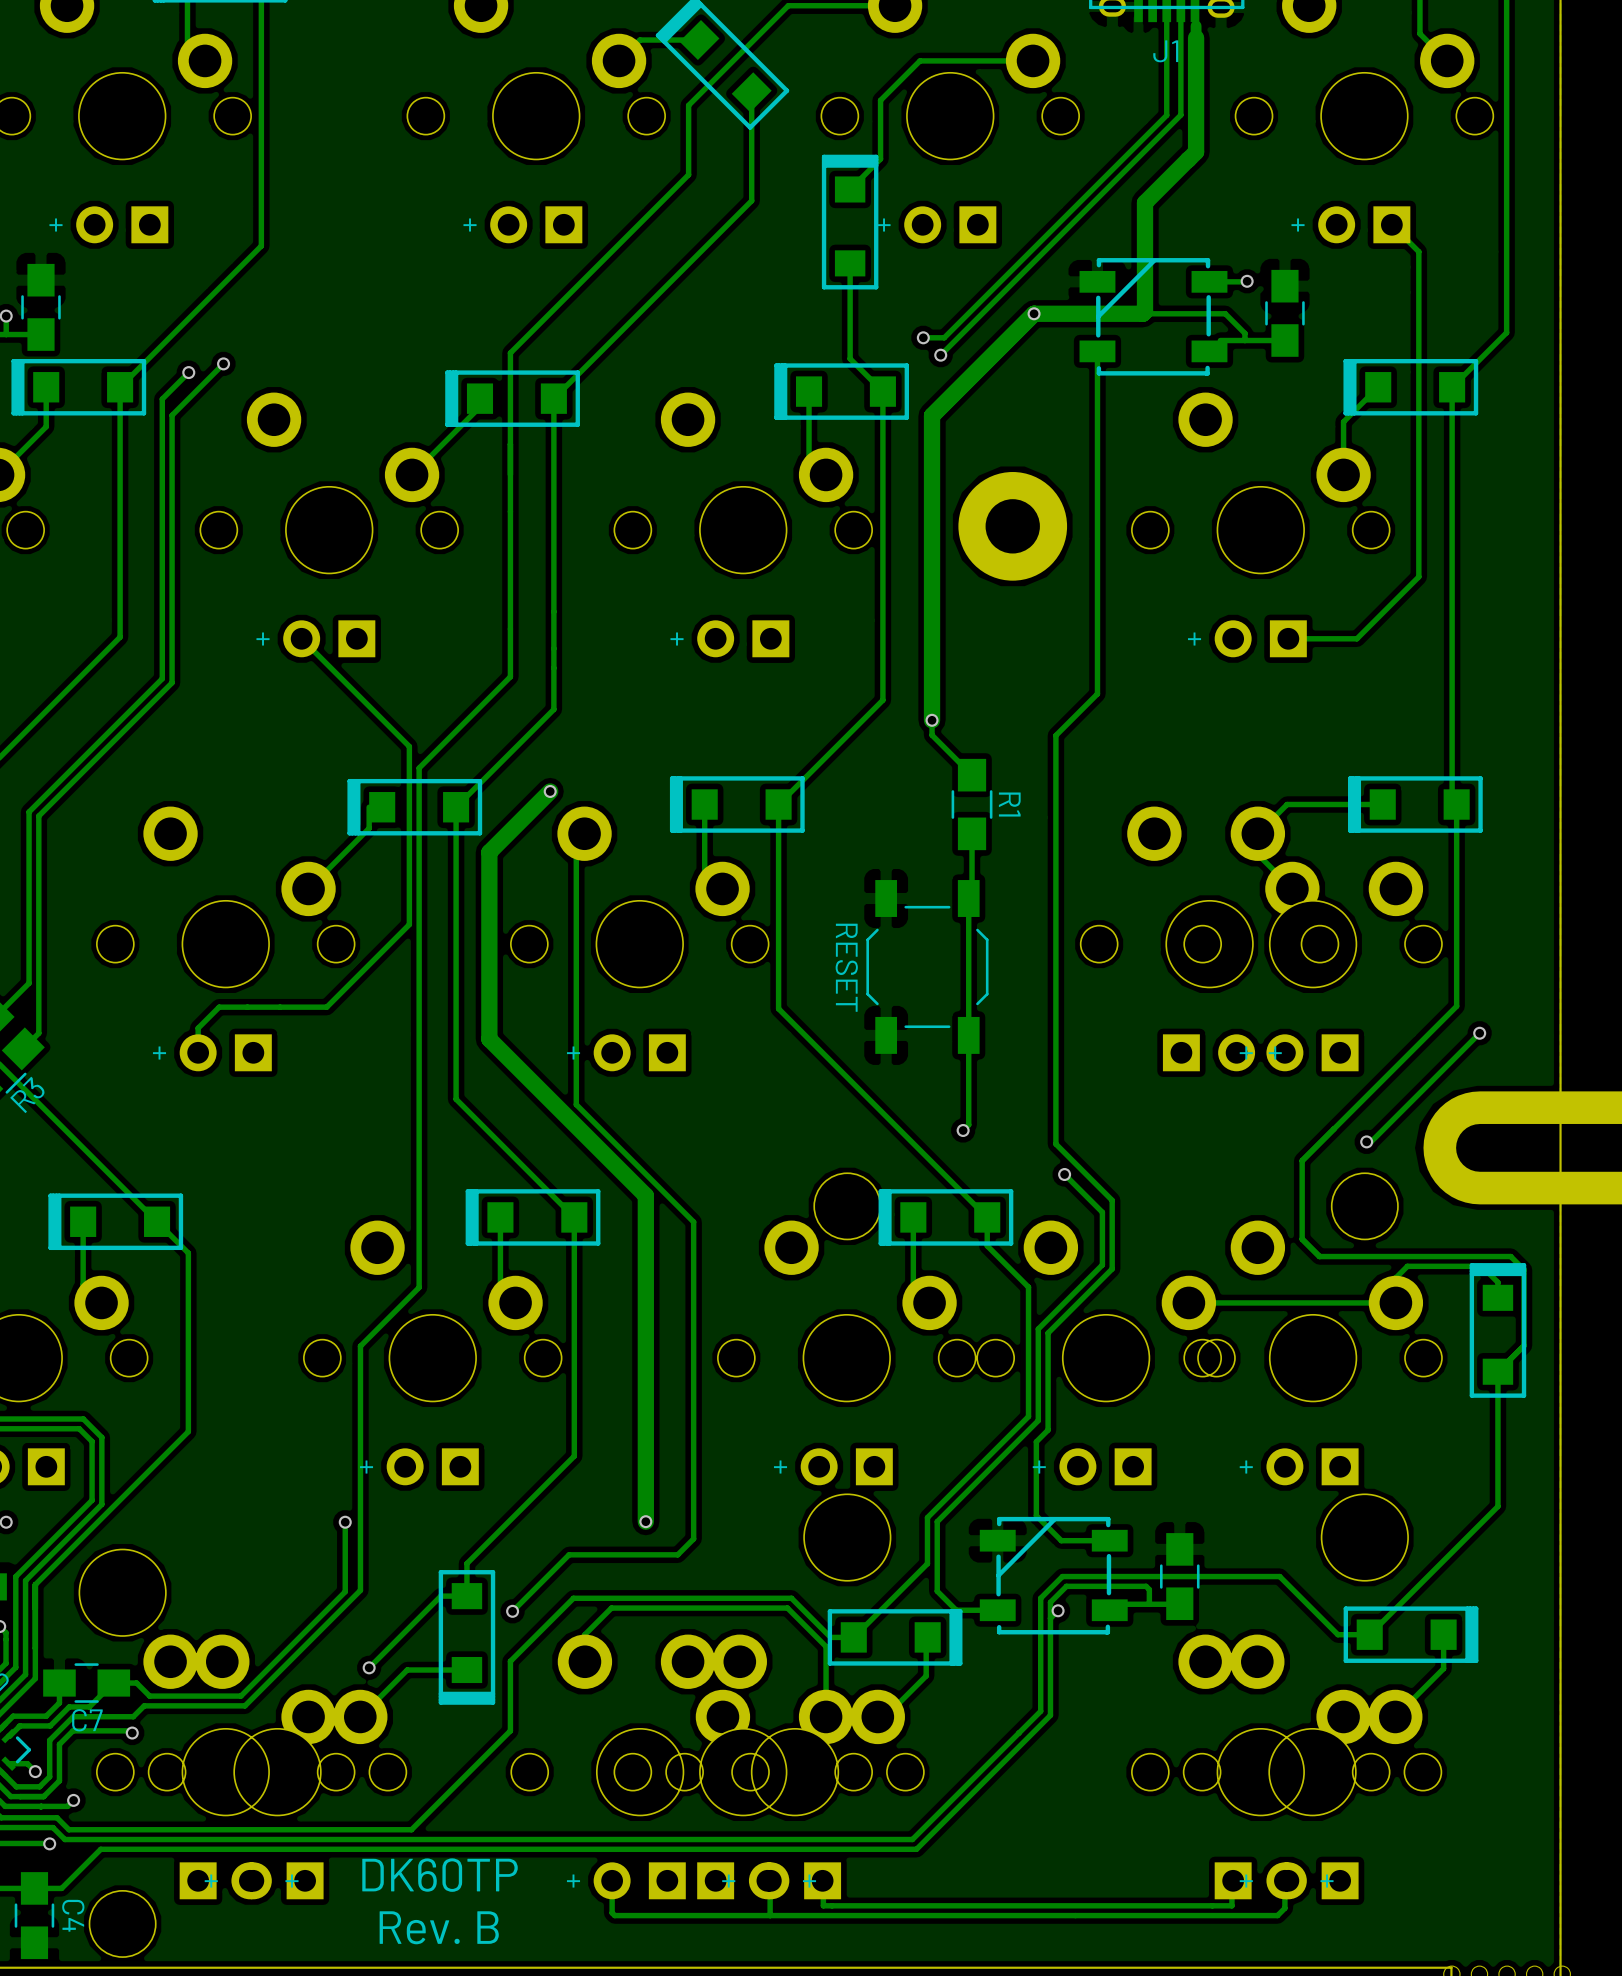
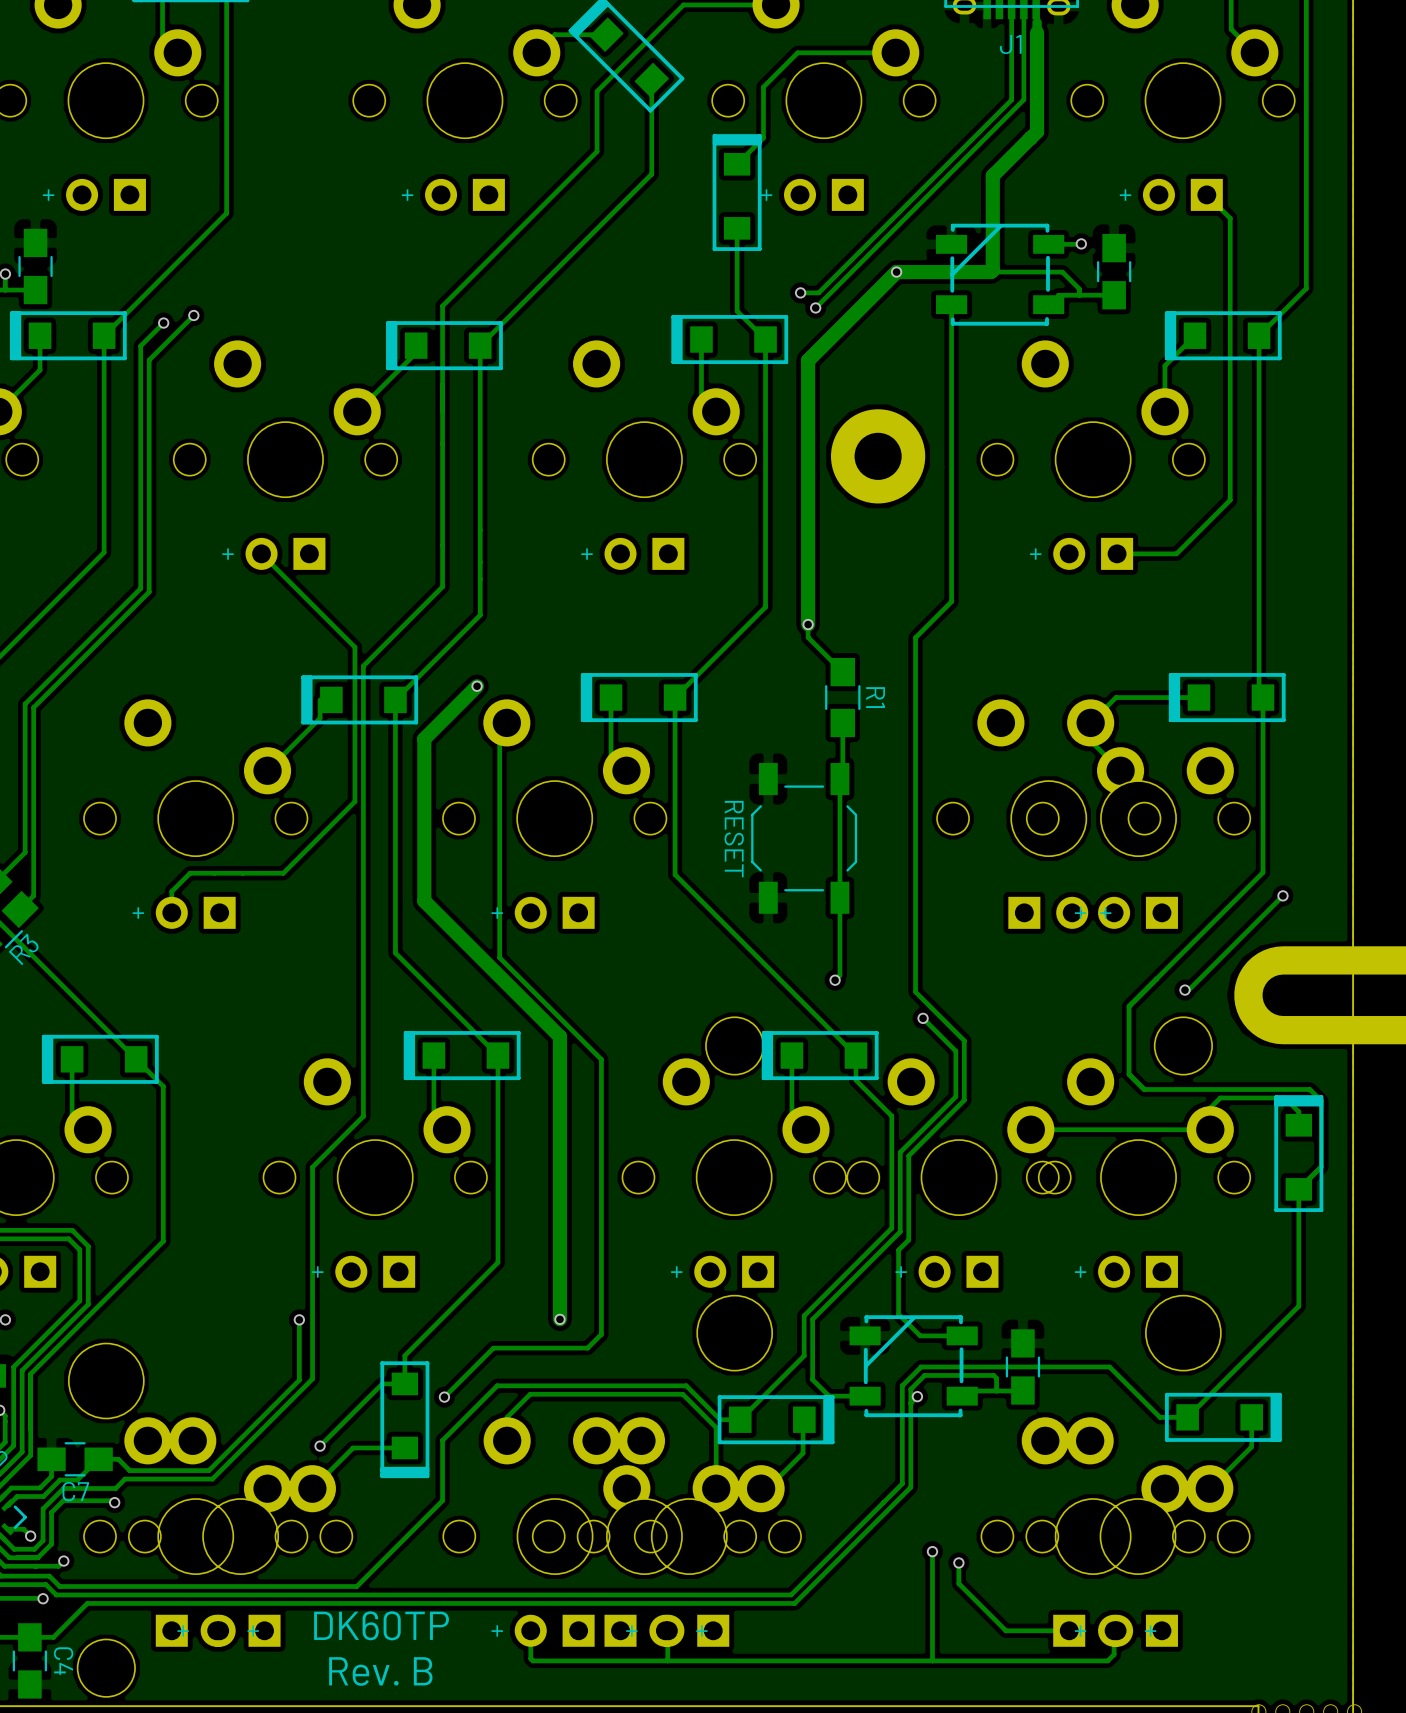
track: none -> (932, 1551) (932, 1660)
via: none -> (932, 1551)
via: none -> (958, 1562)
track: (1233, 1880) (1231, 1905) (823, 1905) (822, 1880) -> (1069, 1630) (1005, 1630) (958, 1583) (958, 1562)

